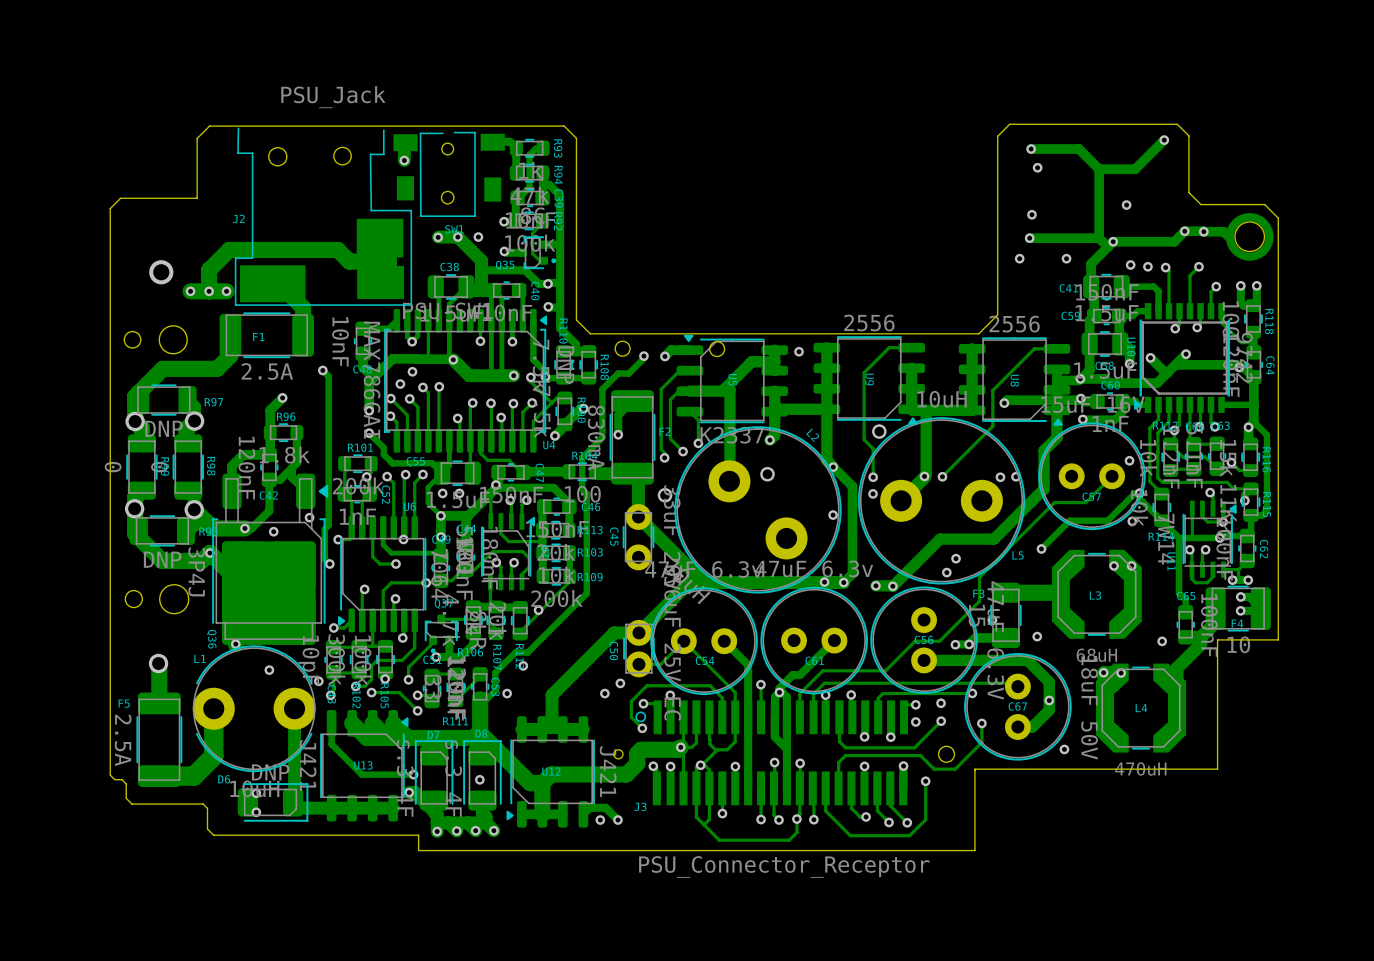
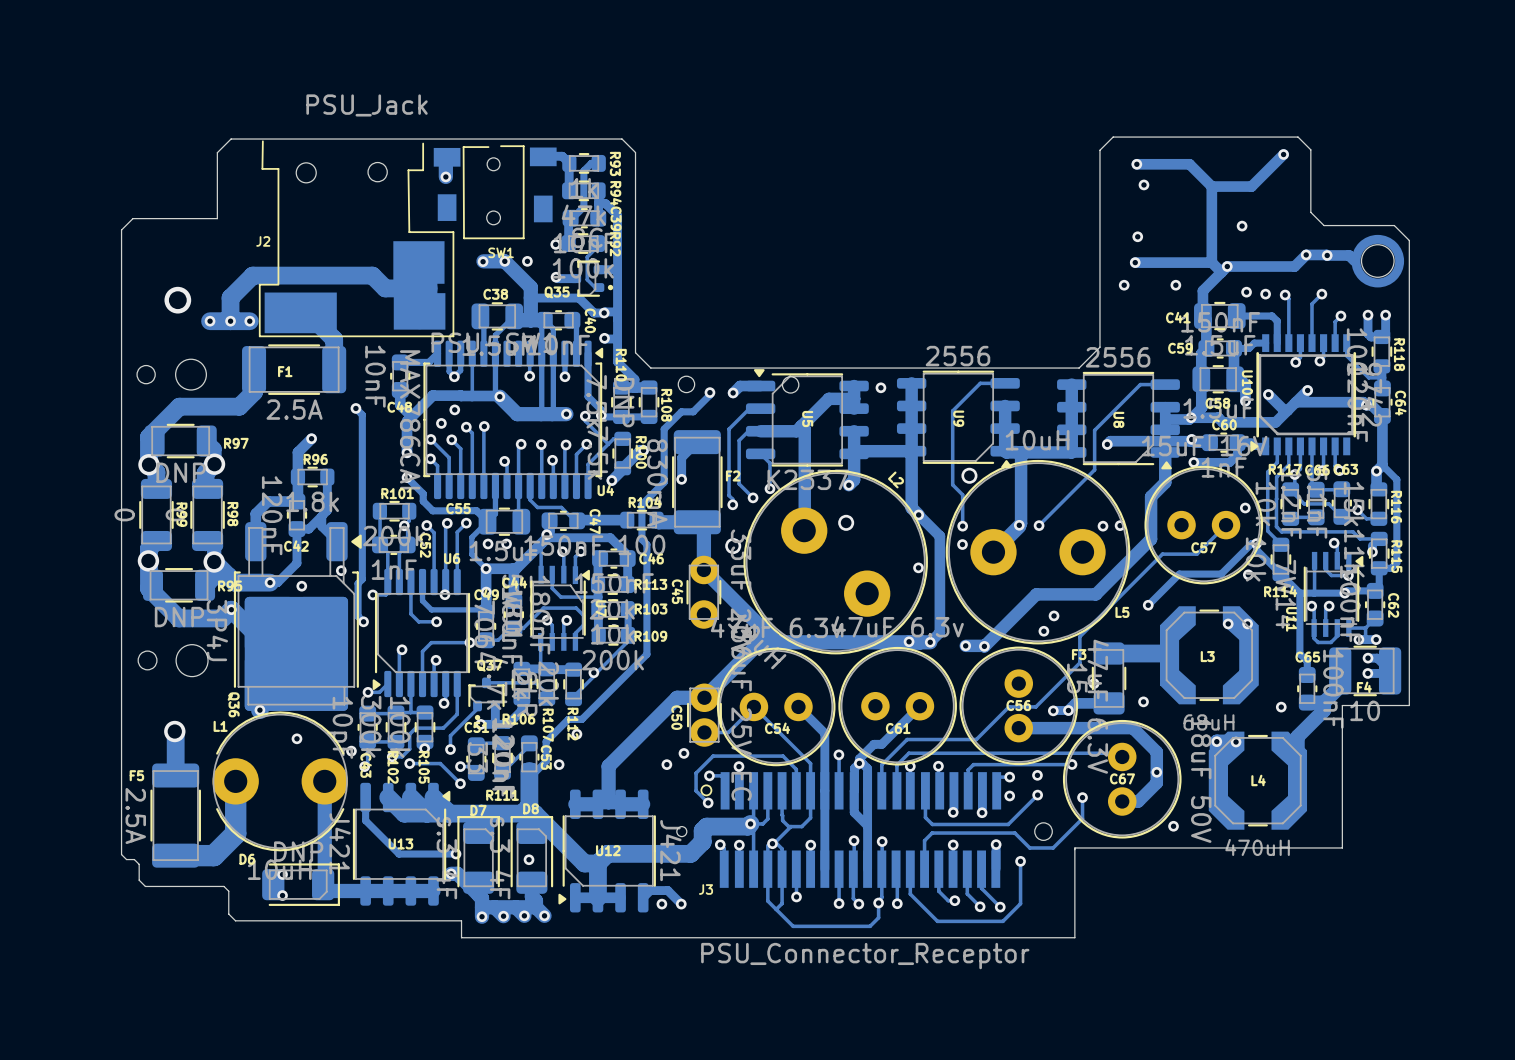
track: (1221, 404) (1252, 404) (1253, 406) -> none

